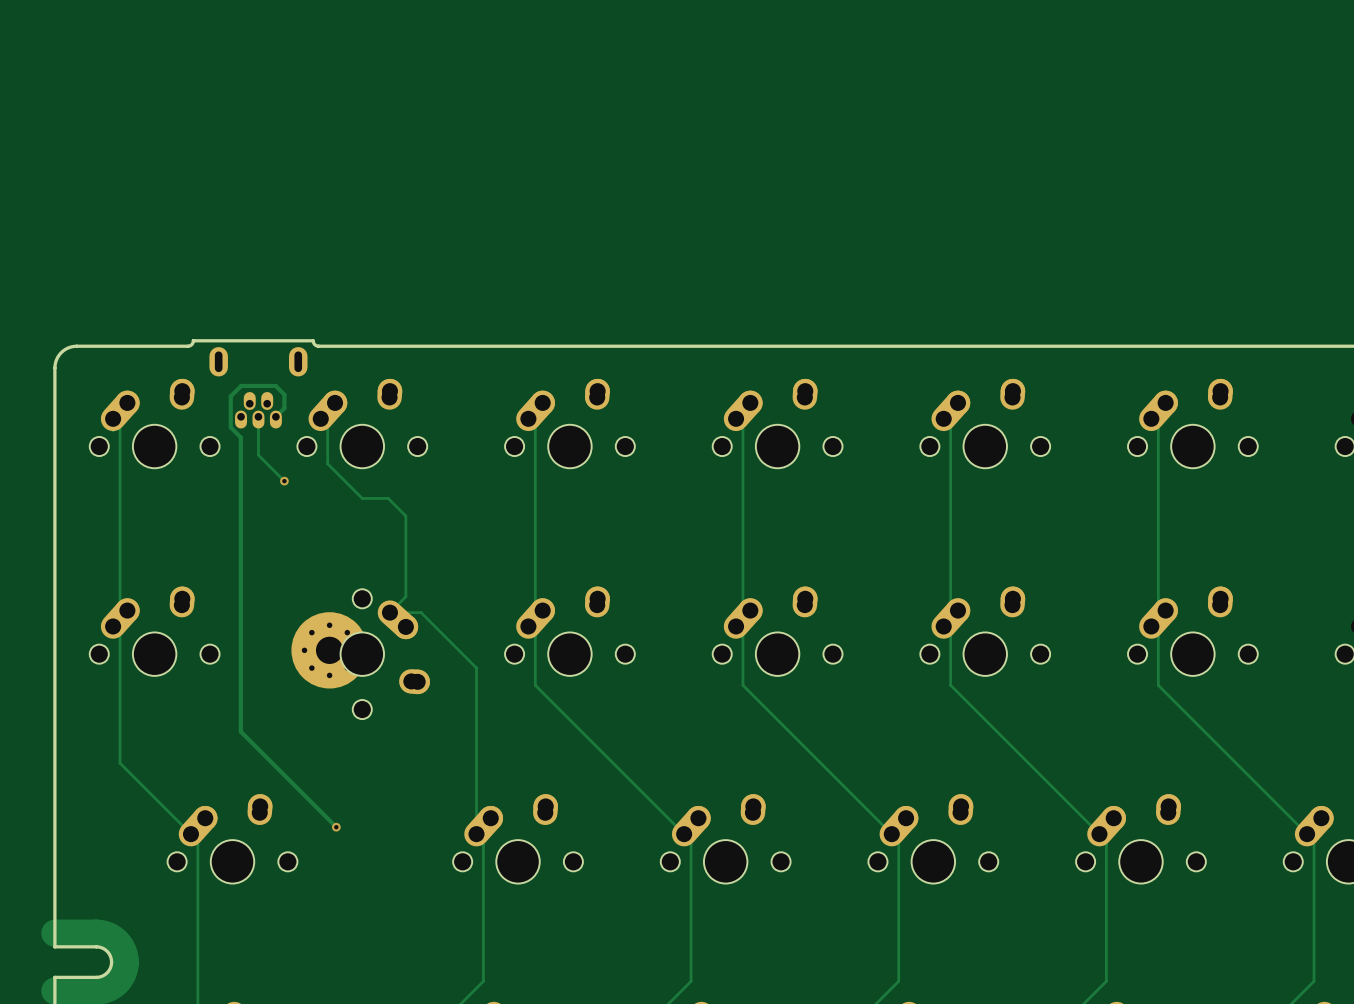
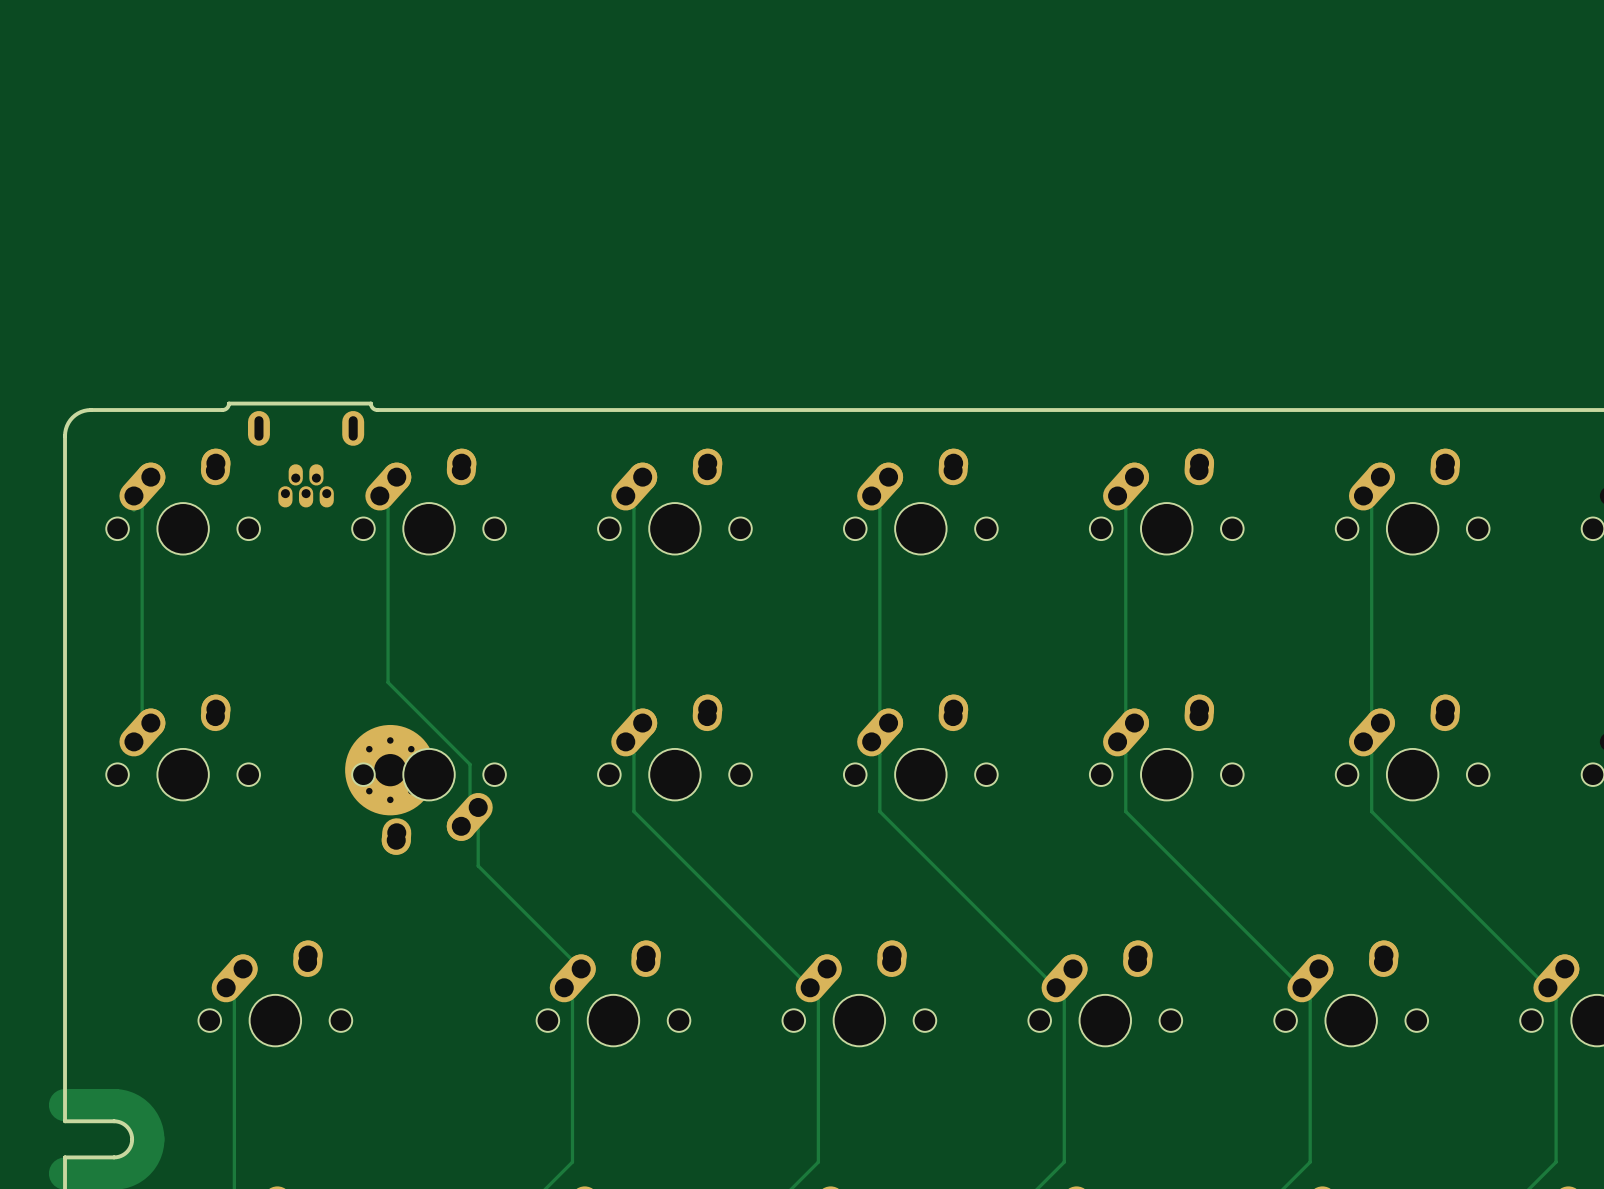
track: (258, 416) (258, 455) (284, 481) -> none
track: (275, 416) (284, 408) (284, 394) (275, 385) (241, 385) (230, 396) (230, 427) (240, 437) (240, 731) (336, 827) -> none
track: (327, 463) (362, 498) (388, 498) (405, 516) (405, 596) (389, 612) (421, 612) (476, 668) (476, 834) -> (388, 549) (388, 682) (470, 764) (470, 799) (478, 807) (478, 865) (581, 968)
via: (284, 481) -> none
track: (113, 626) (113, 629) (120, 636) (120, 763) (190, 834) -> none
part rotation: 0° (385, 654) -> 90° clockwise (429, 801)
via: (336, 827) -> none

